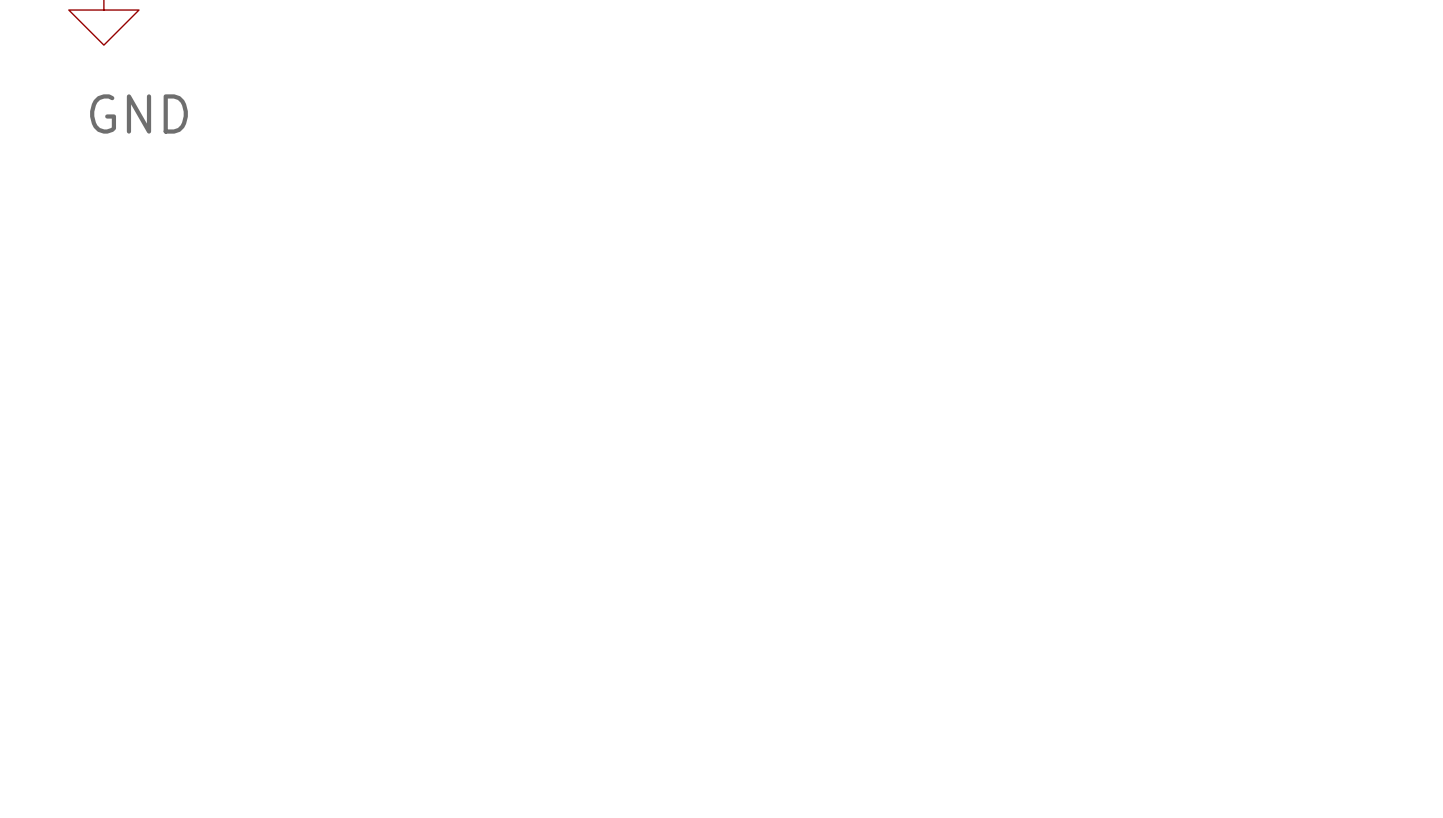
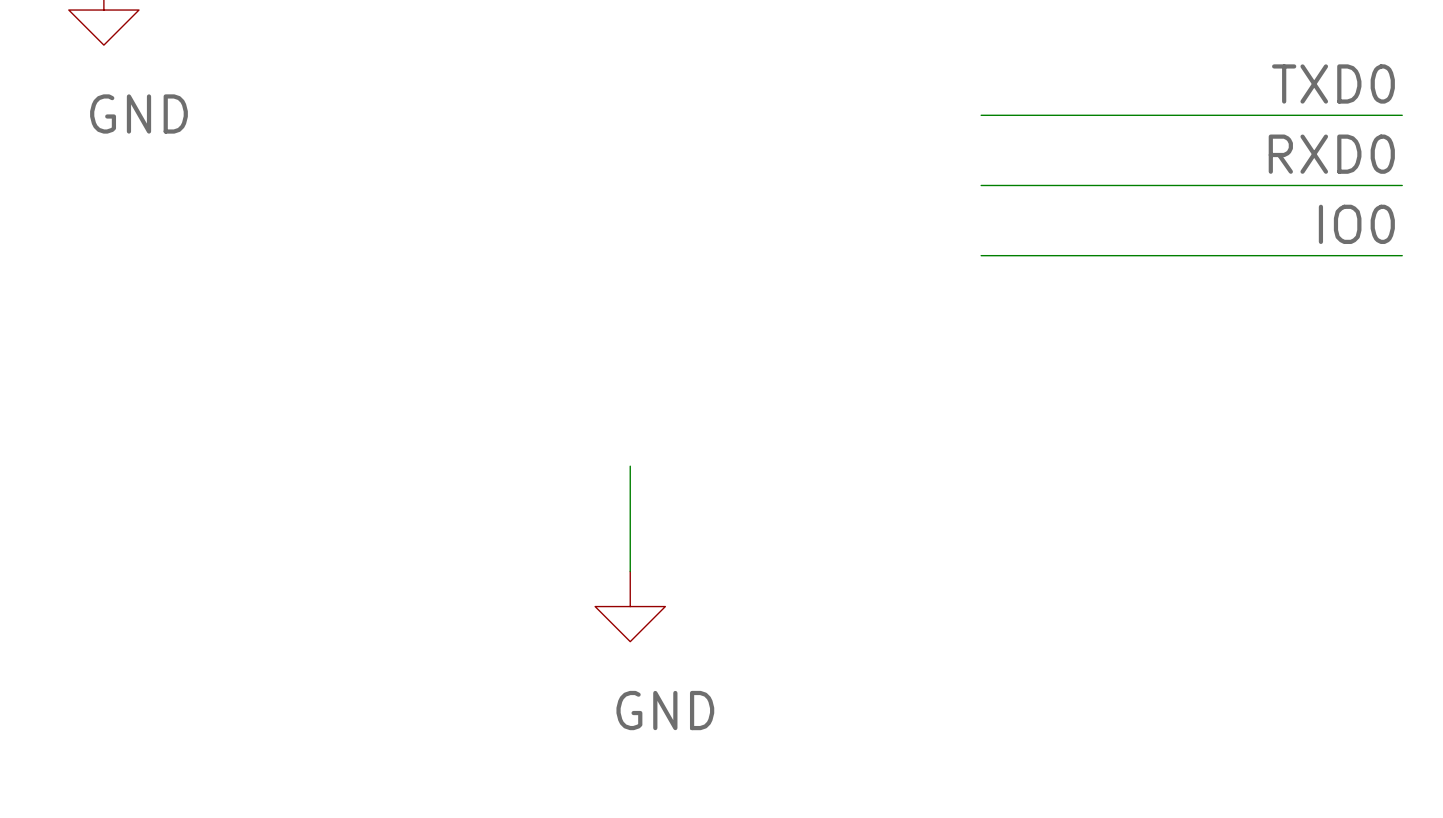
label: none -> TXD0 (1333, 83)
wire: none -> (981, 115) (1402, 115)
label: none -> RXD0 (1331, 154)
wire: none -> (981, 185) (1402, 185)
label: none -> IO0 (1356, 224)
wire: none -> (981, 255) (1402, 255)
wire: none -> (630, 466) (630, 571)
power symbol: none -> GND (630, 606)

